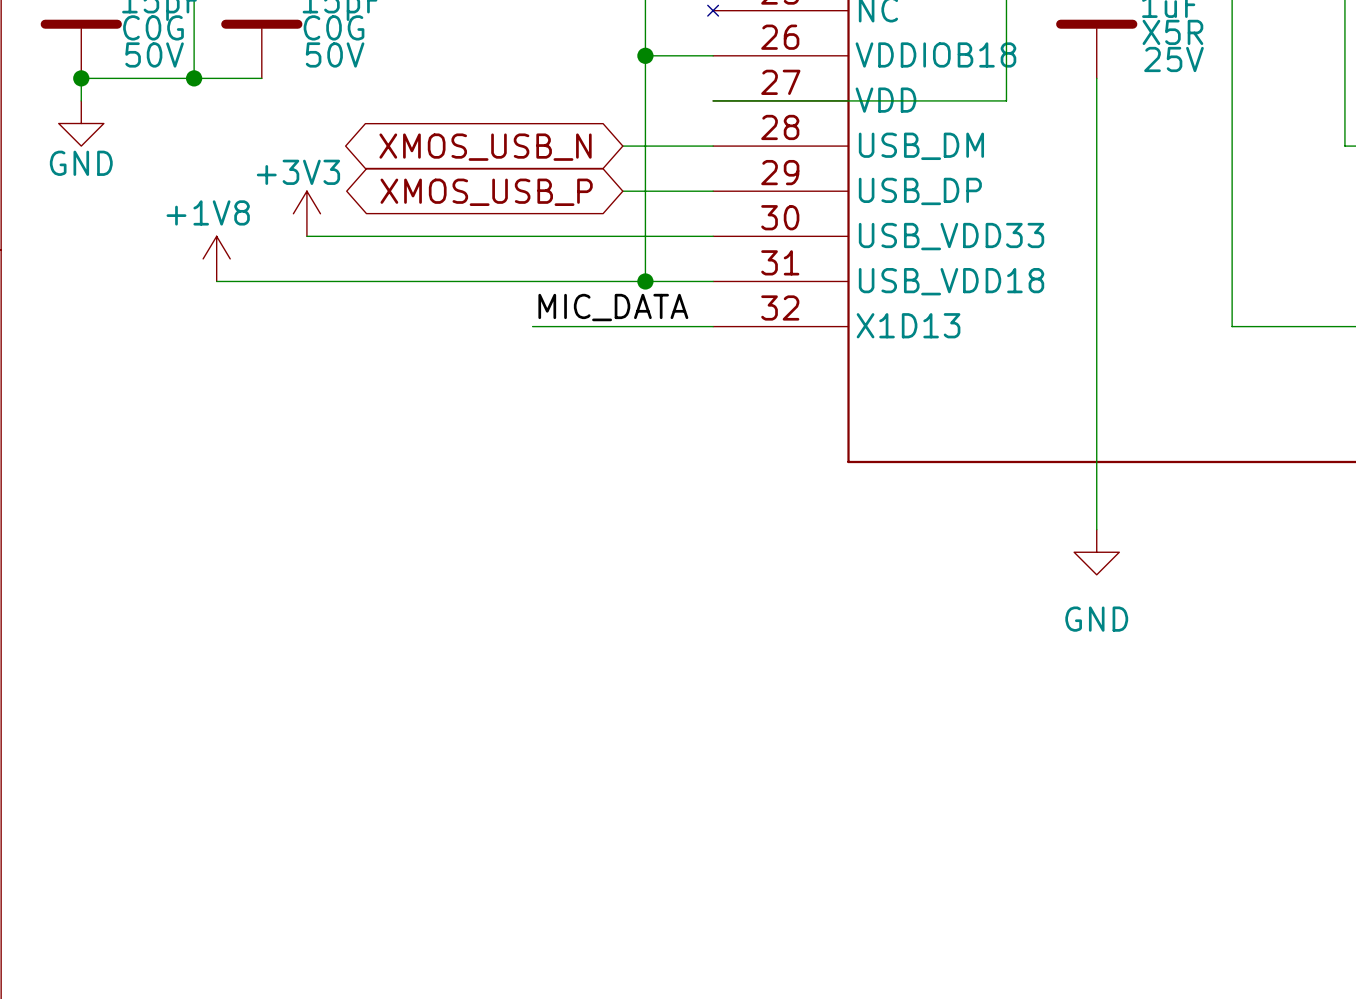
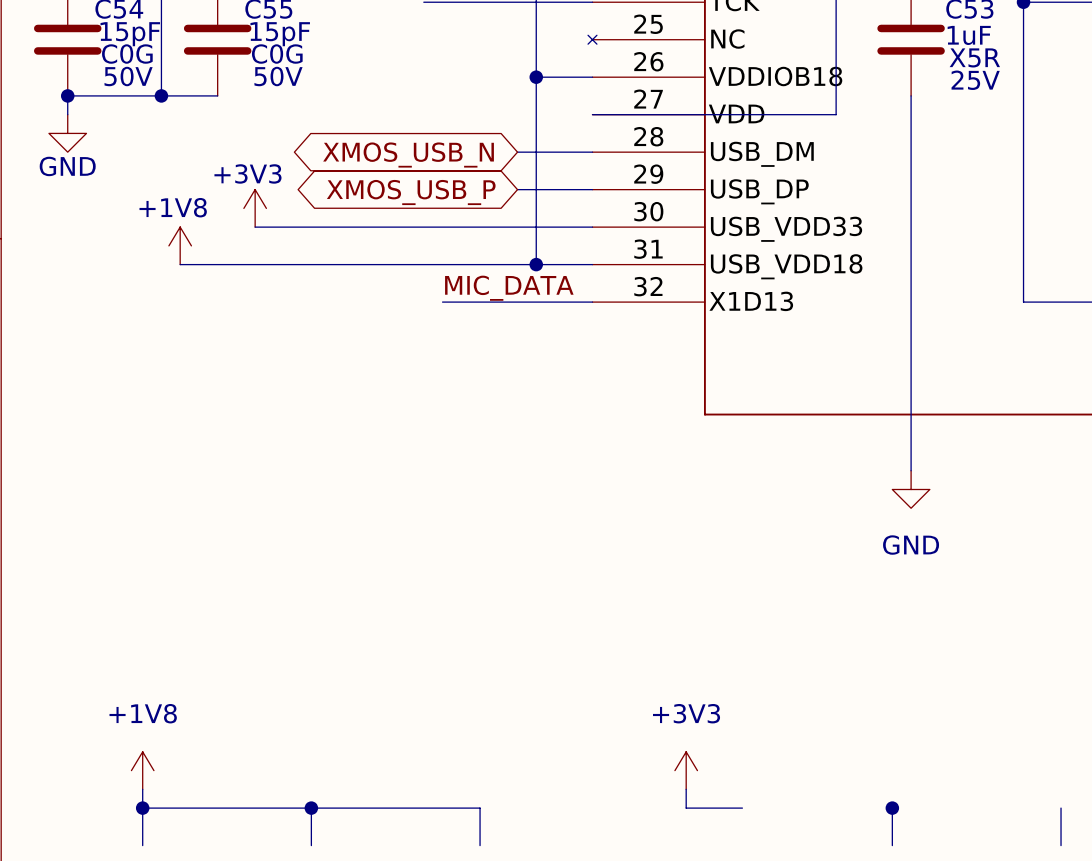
power symbol: none -> +1V8 (142, 770)
power symbol: none -> +3V3 (686, 770)
wire: none -> (142, 789) (142, 845)
wire: none -> (686, 789) (686, 808) (742, 808)
wire: none -> (142, 808) (480, 808) (480, 845)
junction: none -> (142, 808)
wire: none -> (311, 808) (311, 845)
junction: none -> (311, 808)
wire: none -> (892, 808) (892, 845)
junction: none -> (892, 808)
wire: none -> (1061, 808) (1061, 845)

